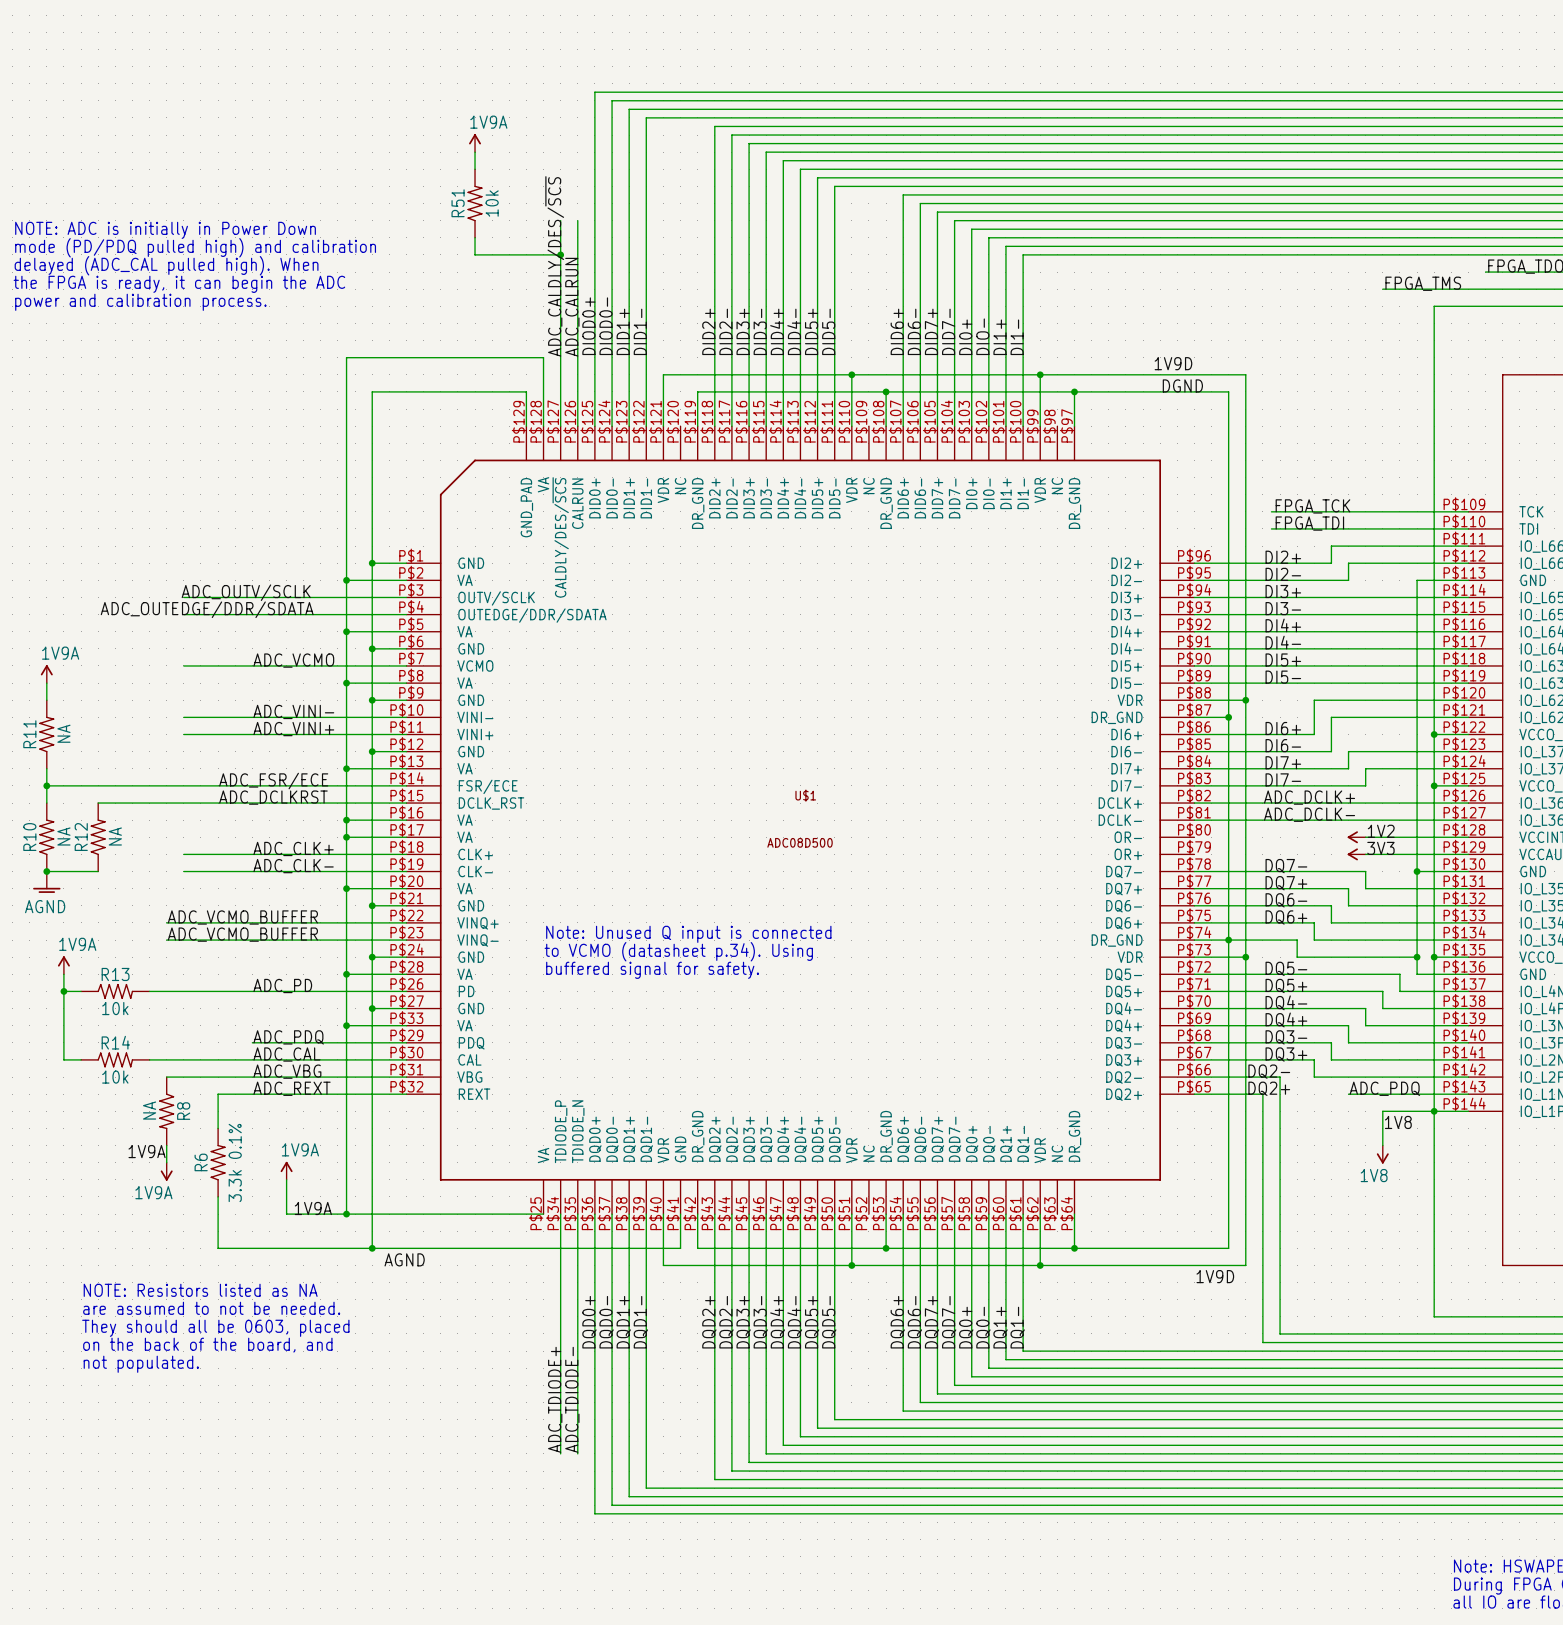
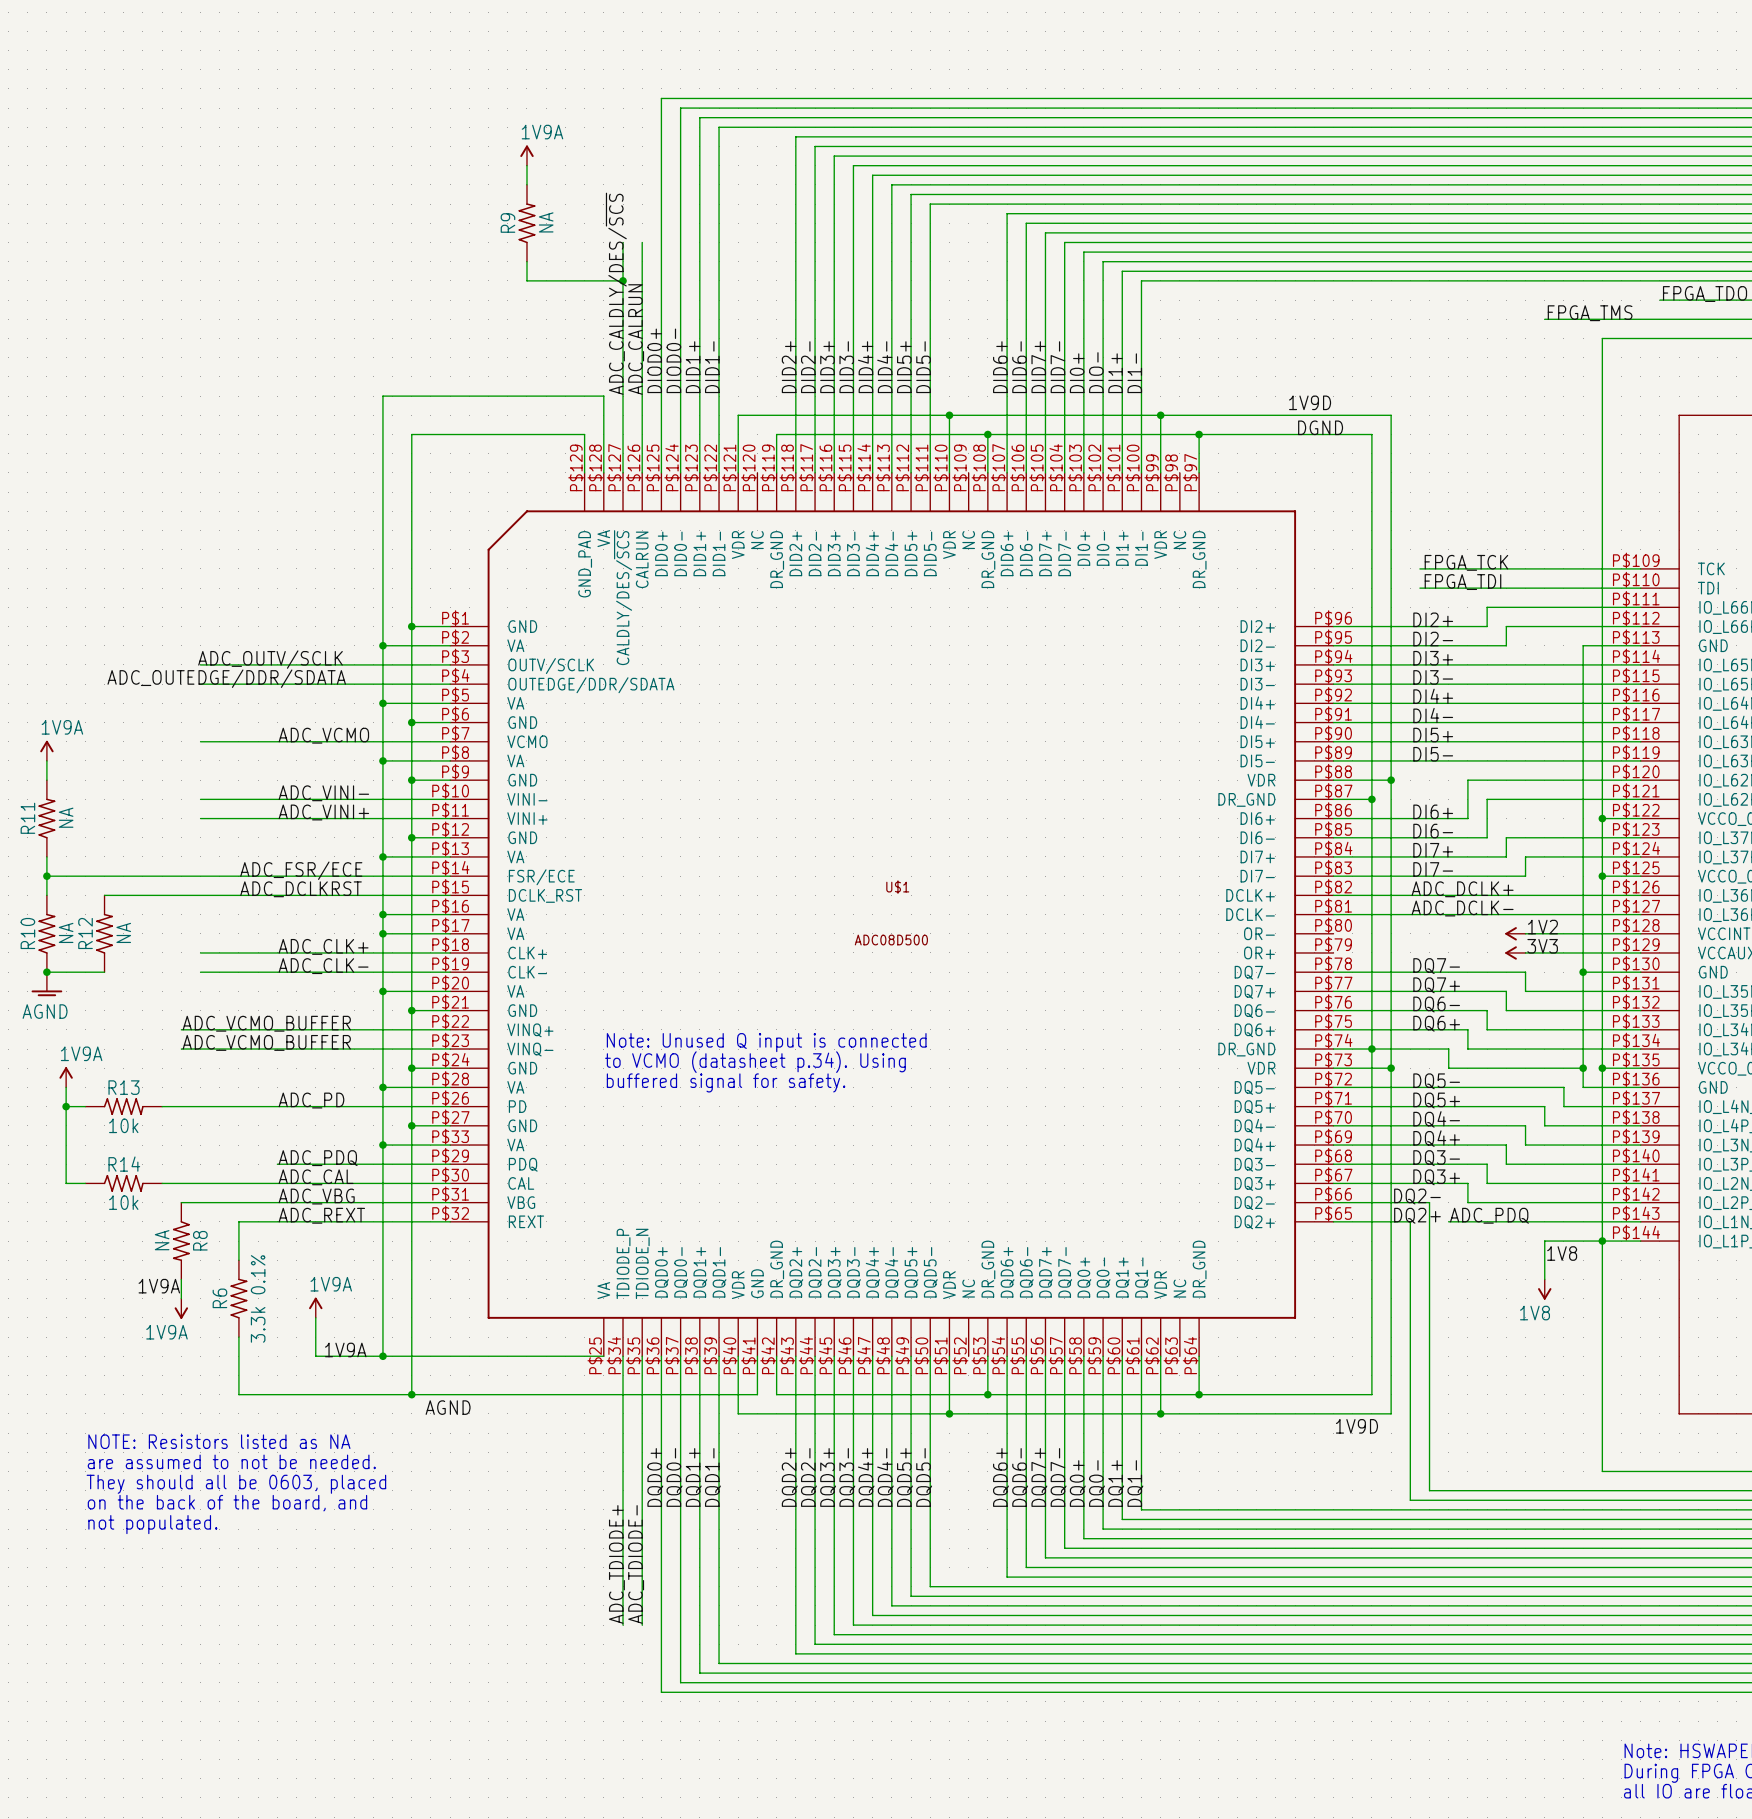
R51 name: R51 (458, 203) -> R9 (507, 222)
R51 value: 10k (492, 203) -> NA (546, 222)
text: NOTE: ADC is initially in Power Down (165, 230) -> none
text: mode (PD/PDQ pulled high) and calibration (195, 247) -> none
text: delayed (ADC_CAL pulled high). When (166, 265) -> none
text: the FPGA is ready, it can begin the ADC (179, 284) -> none
text: power and calibration process. (140, 302) -> none
label position: ADC_PDQ (1384, 1088) -> ADC_PDQ (1489, 1215)
wire: none -> (1448, 1221) (1506, 1221)

